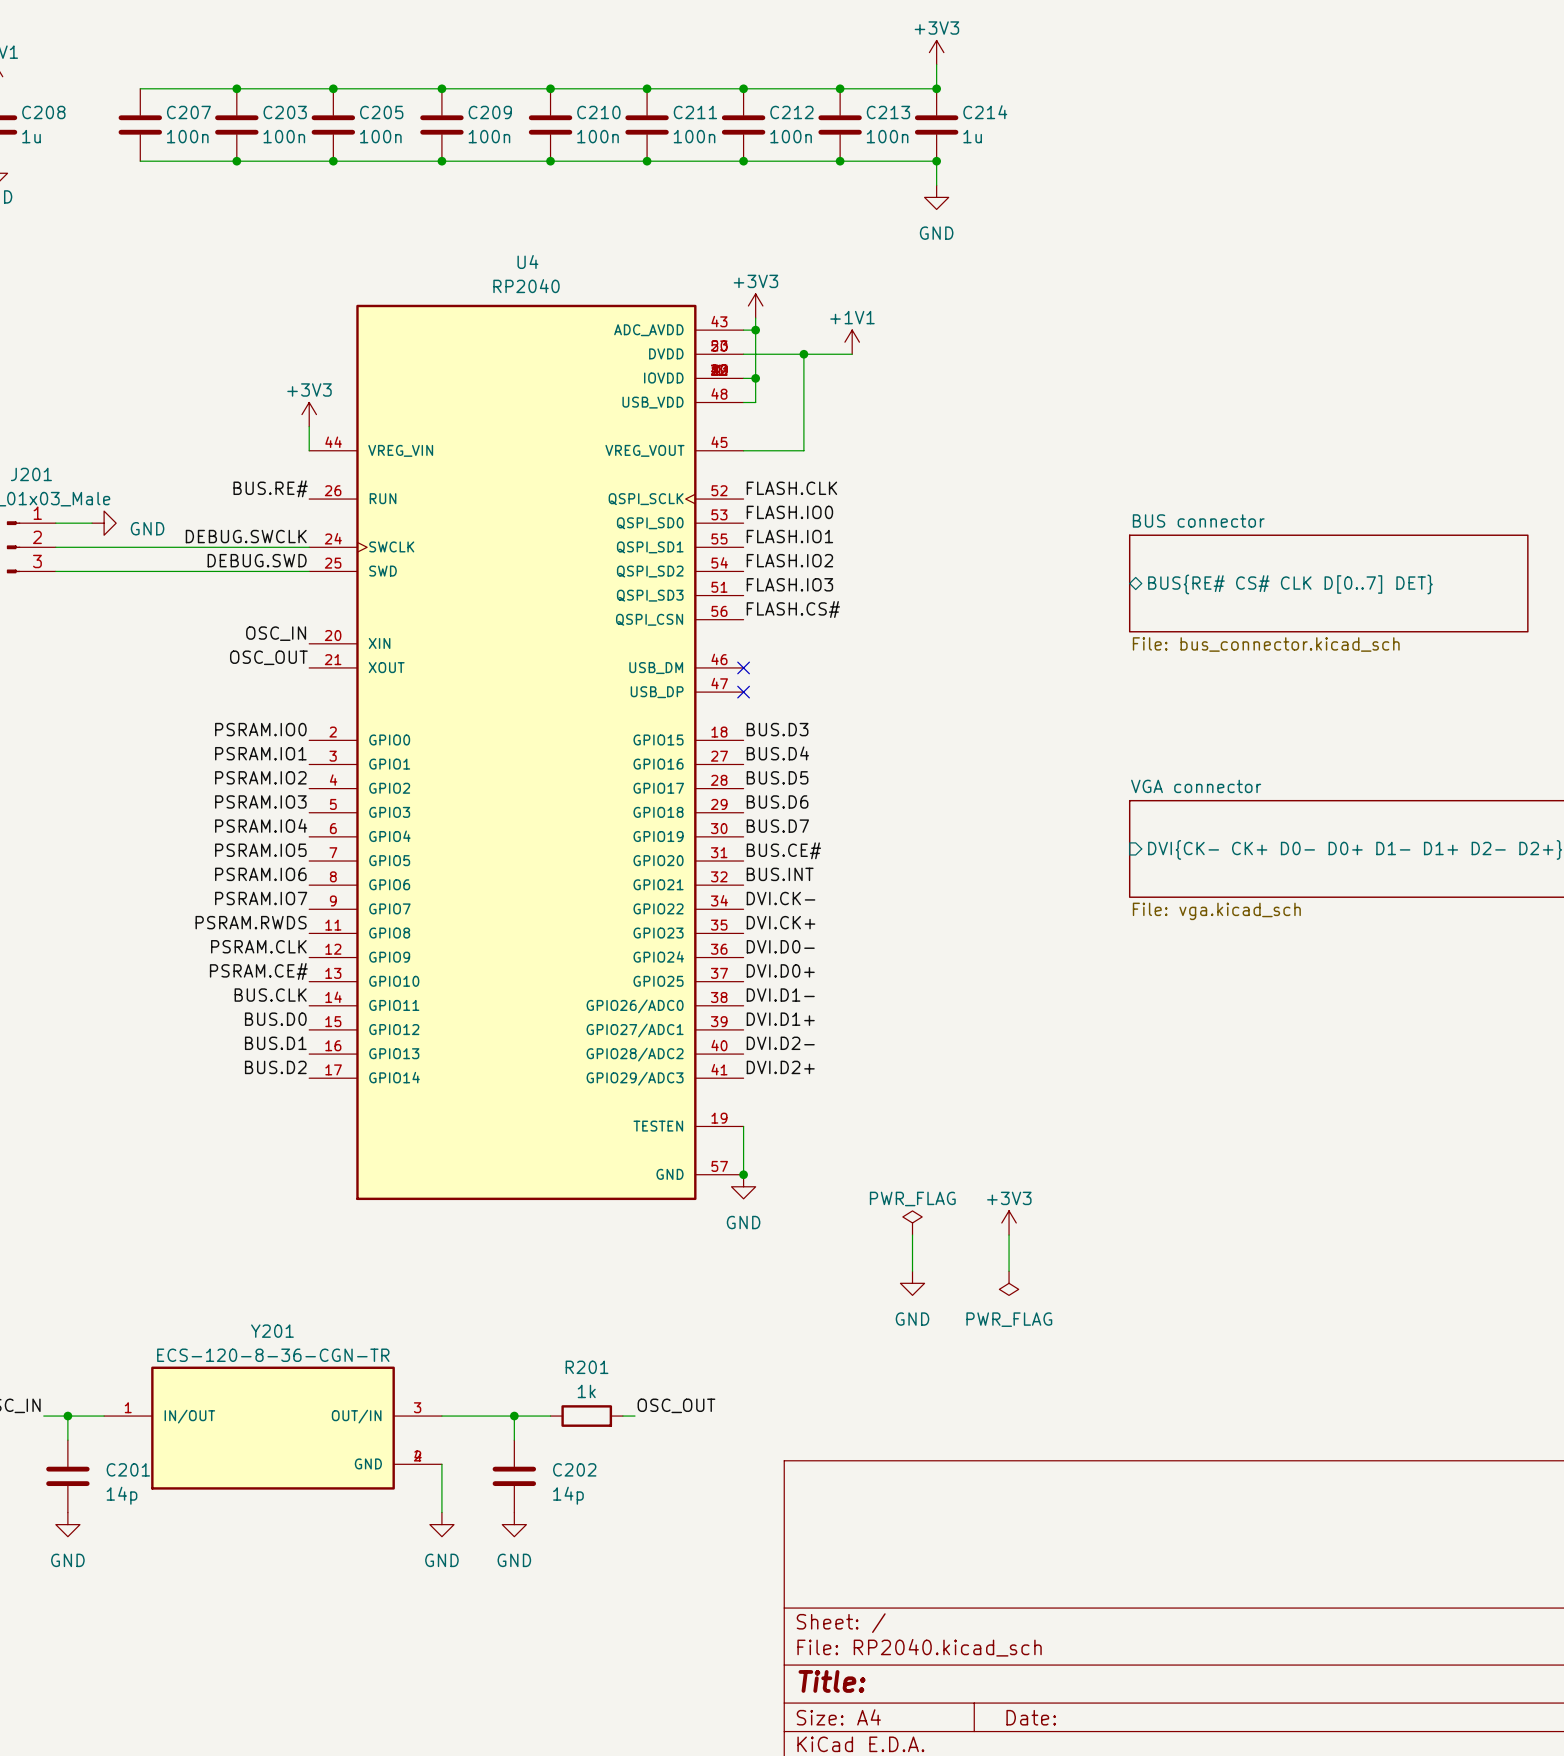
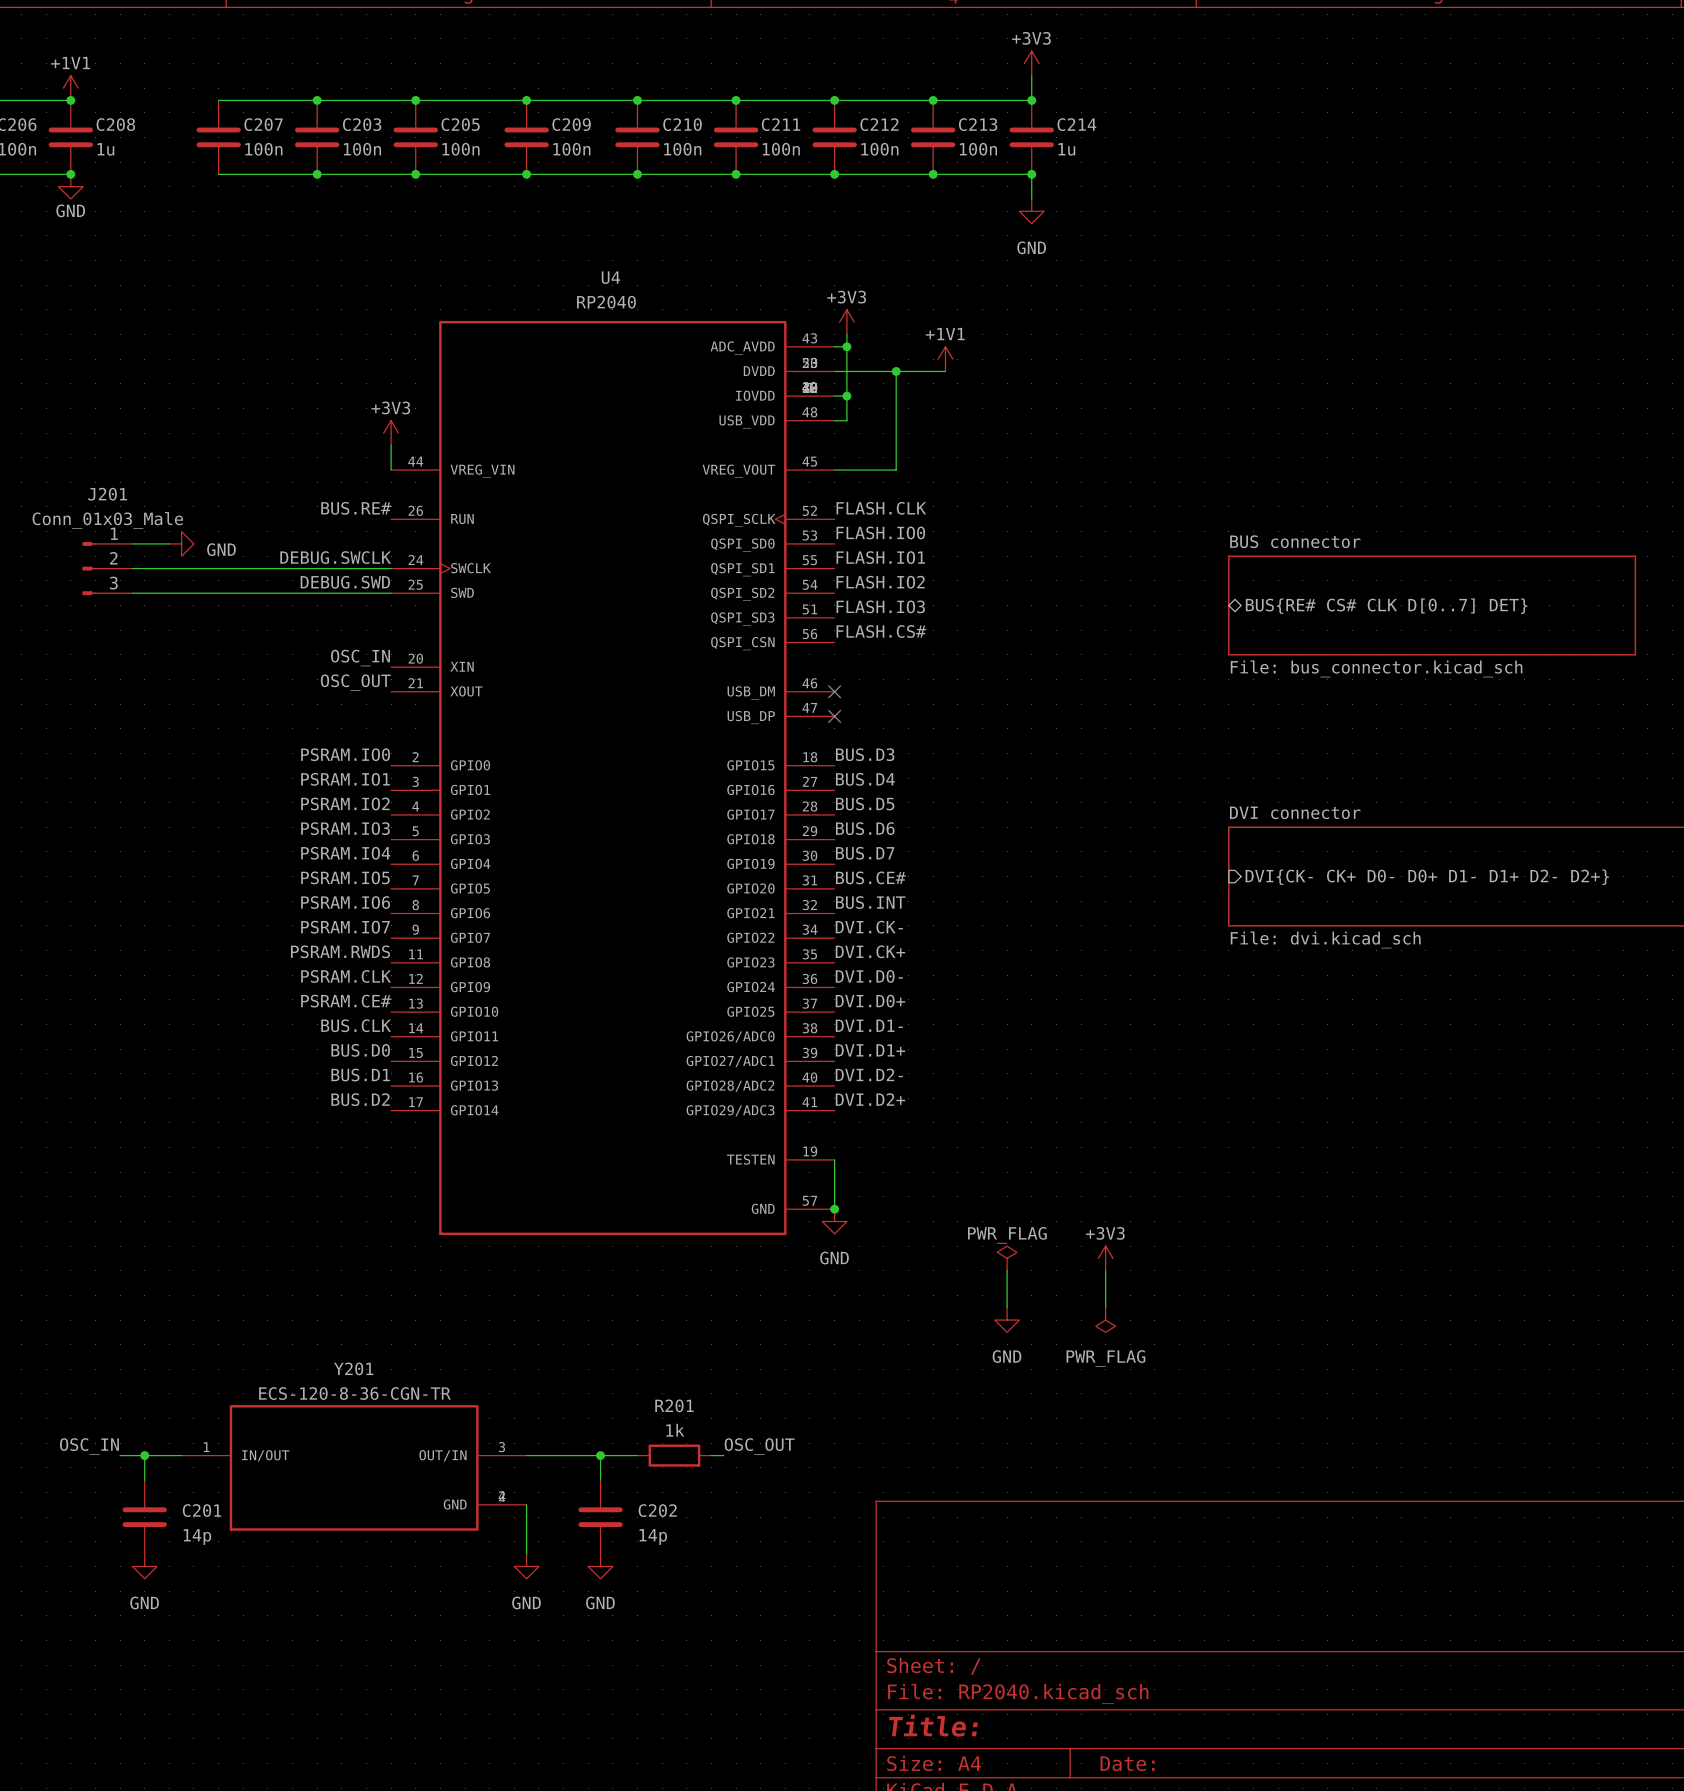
sheet VGA connector name: VGA connector (1196, 786) -> DVI connector (1295, 812)
sheet VGA connector value: File: vga.kicad_sch (1216, 911) -> File: dvi.kicad_sch (1325, 939)

